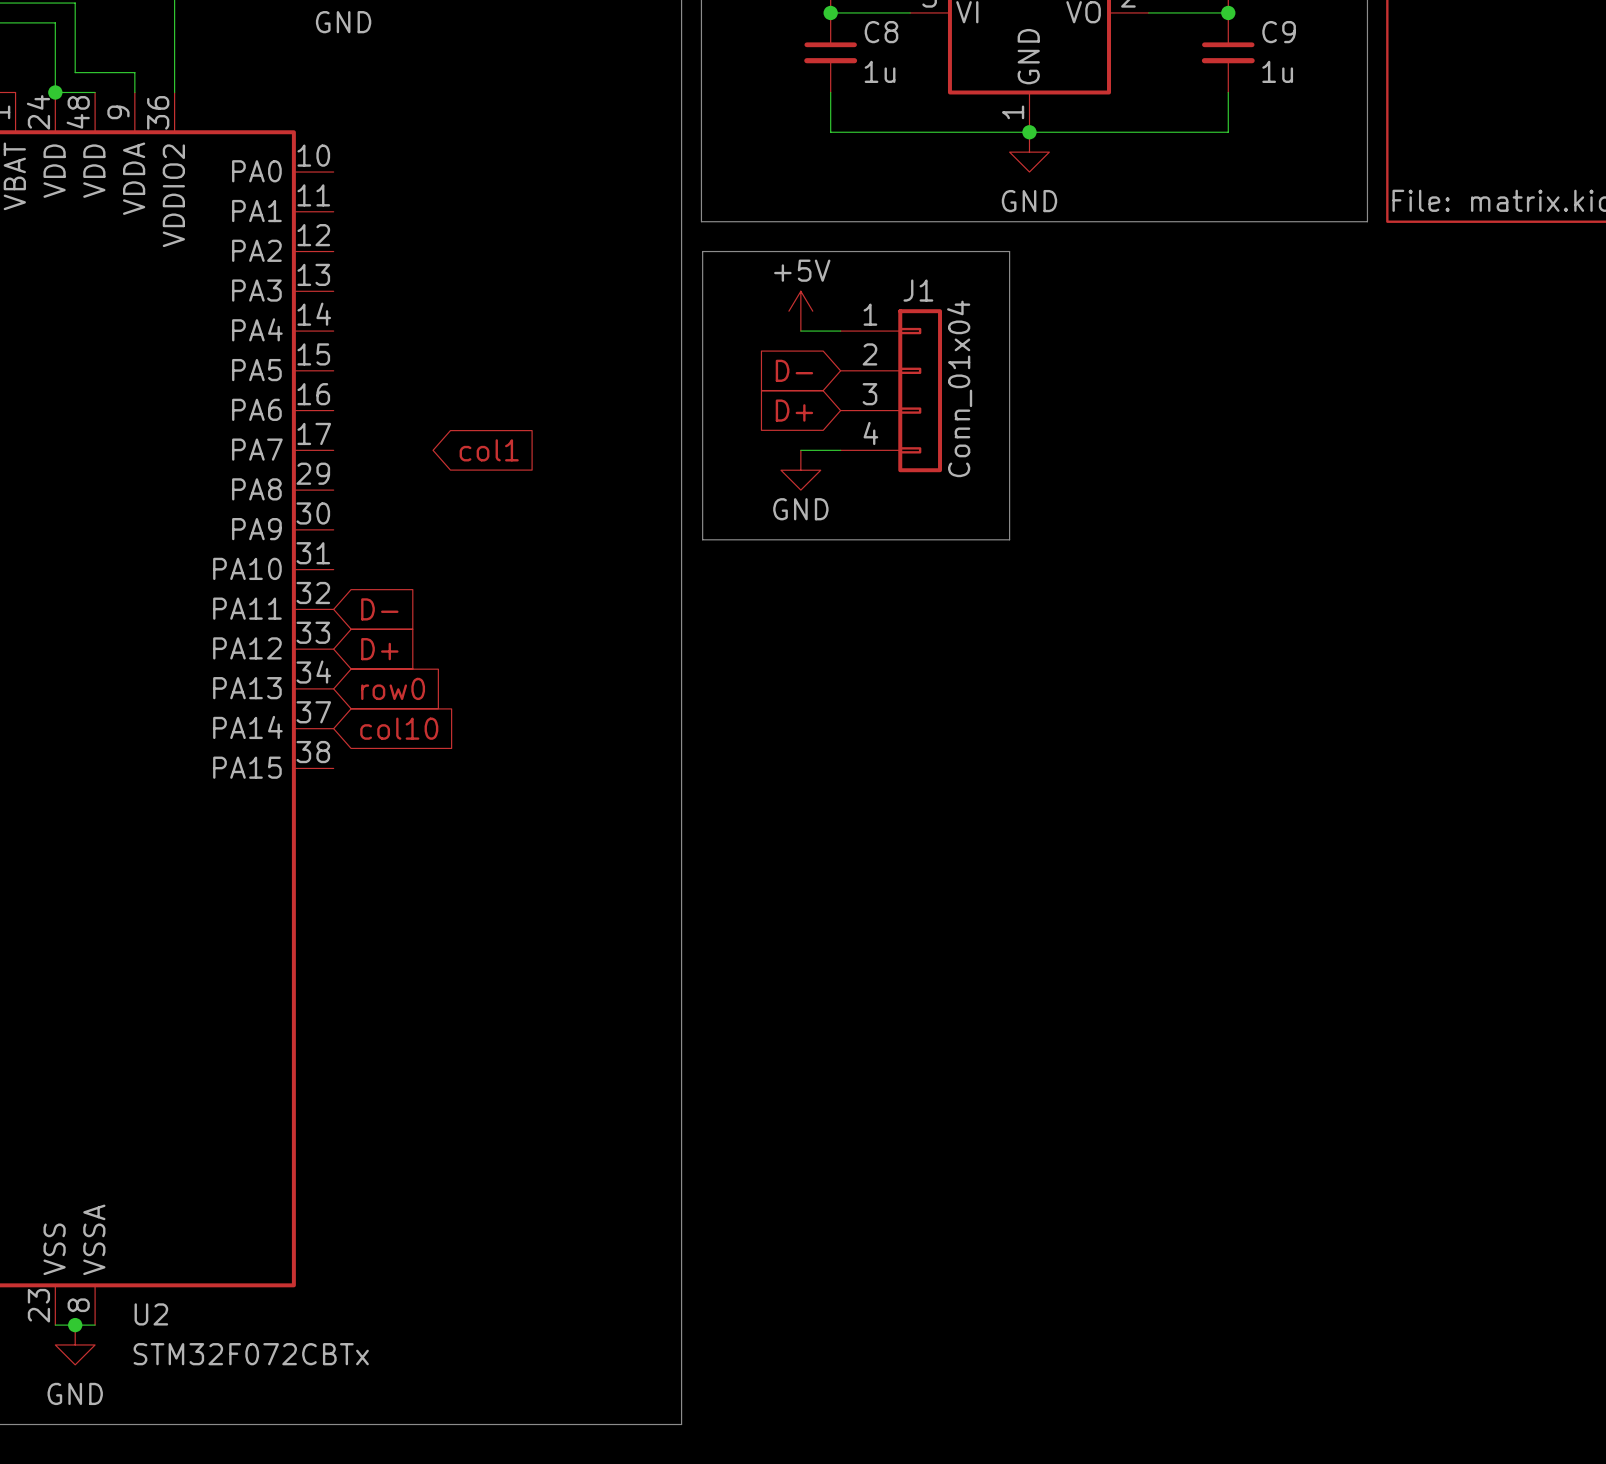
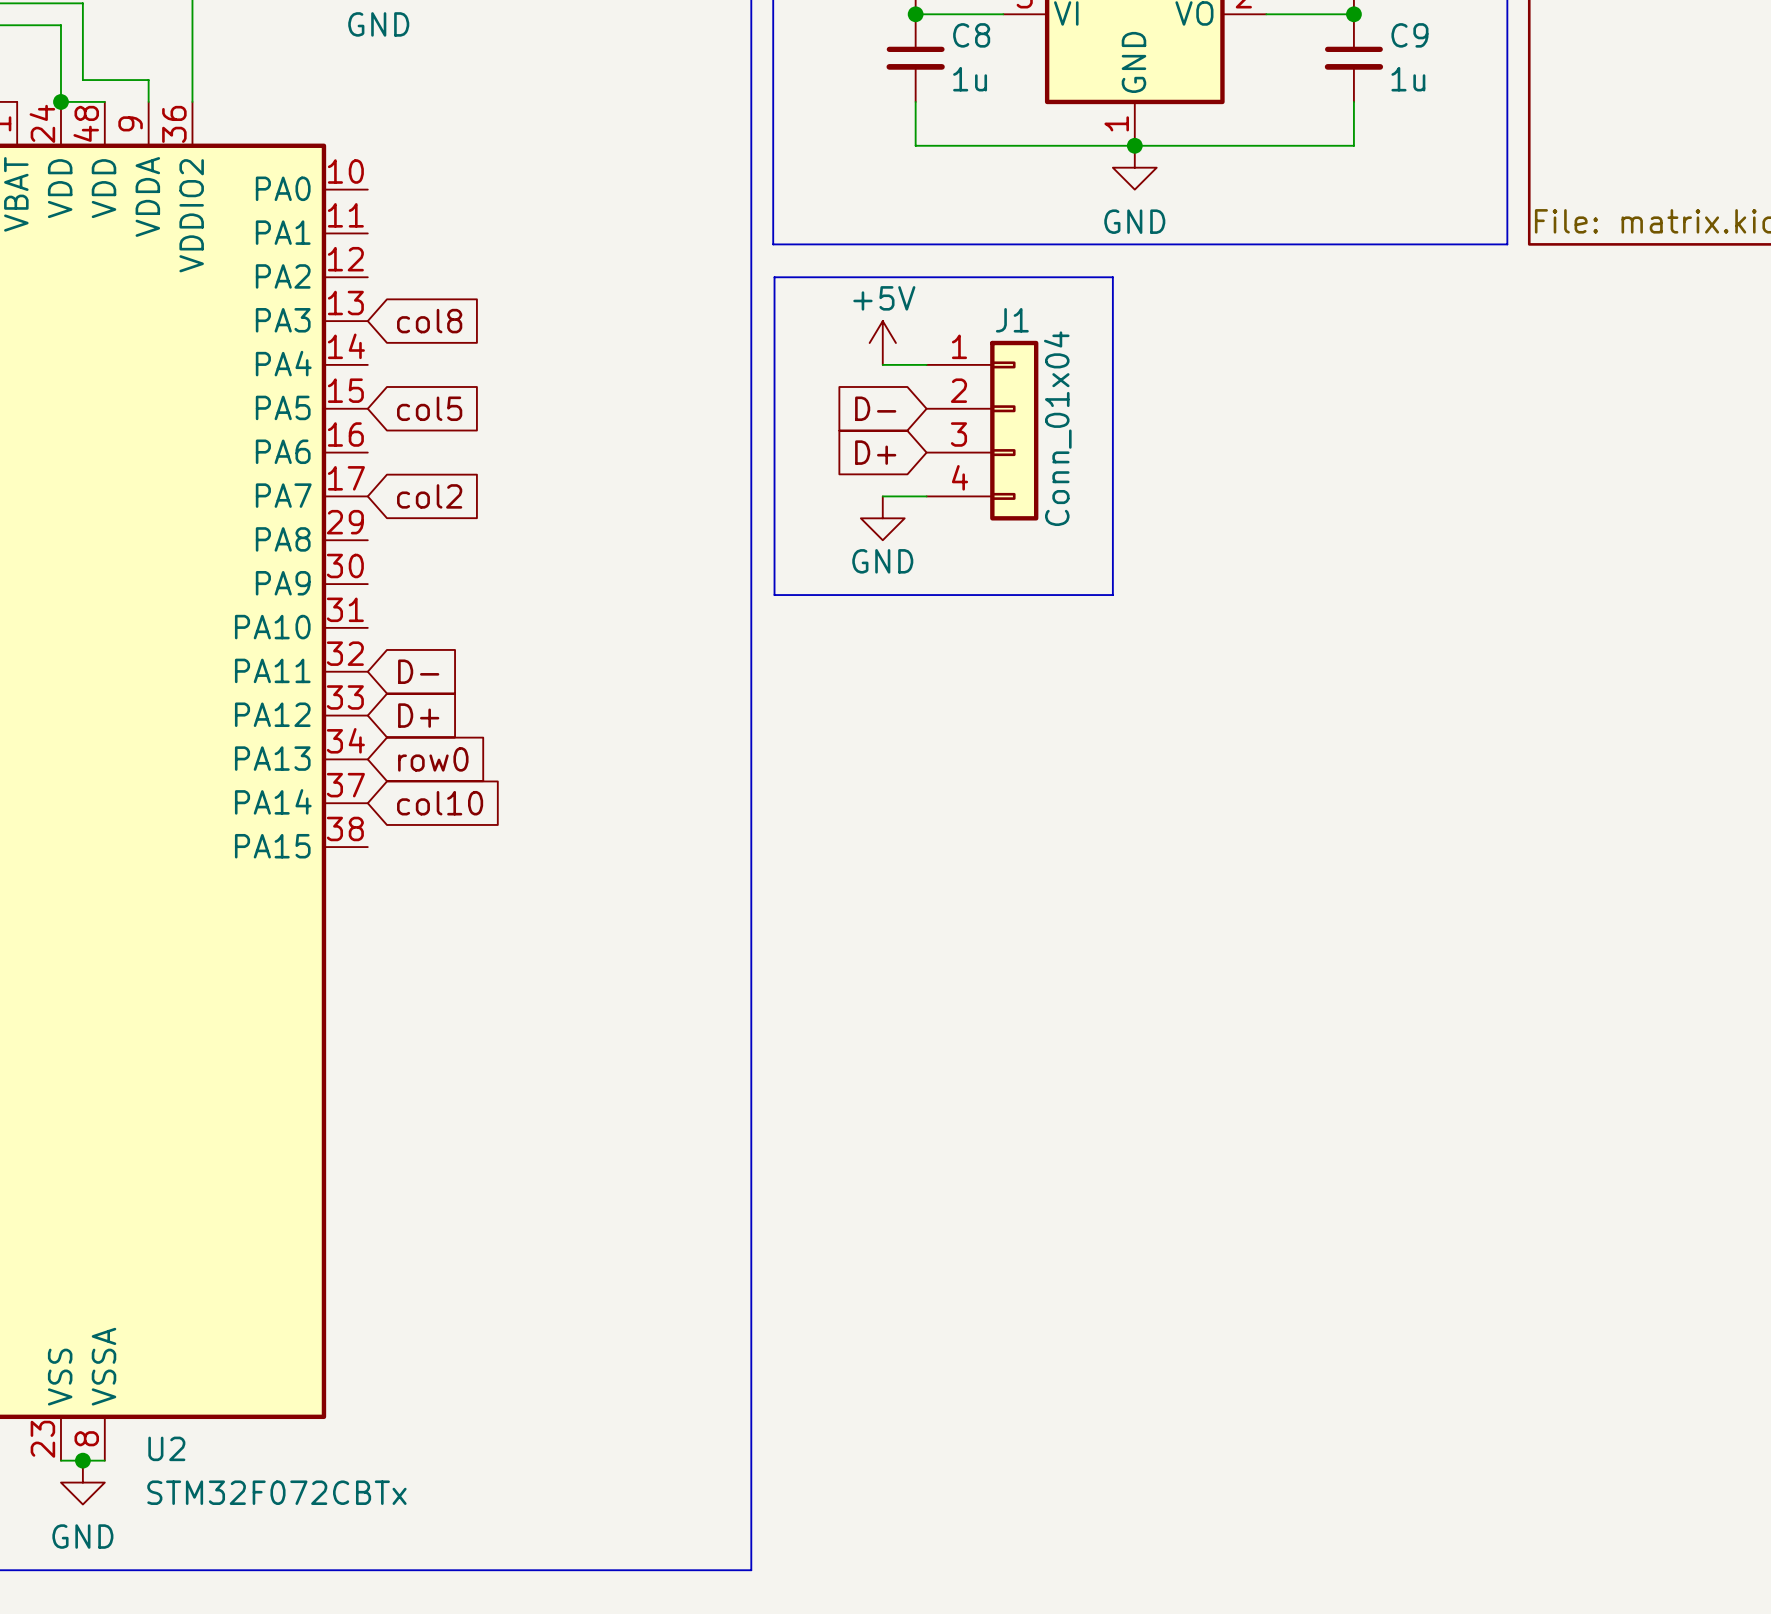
global label: none -> col8 (429, 321)
global label: none -> col5 (429, 408)
global label: col1 (489, 450) -> col2 (429, 496)

